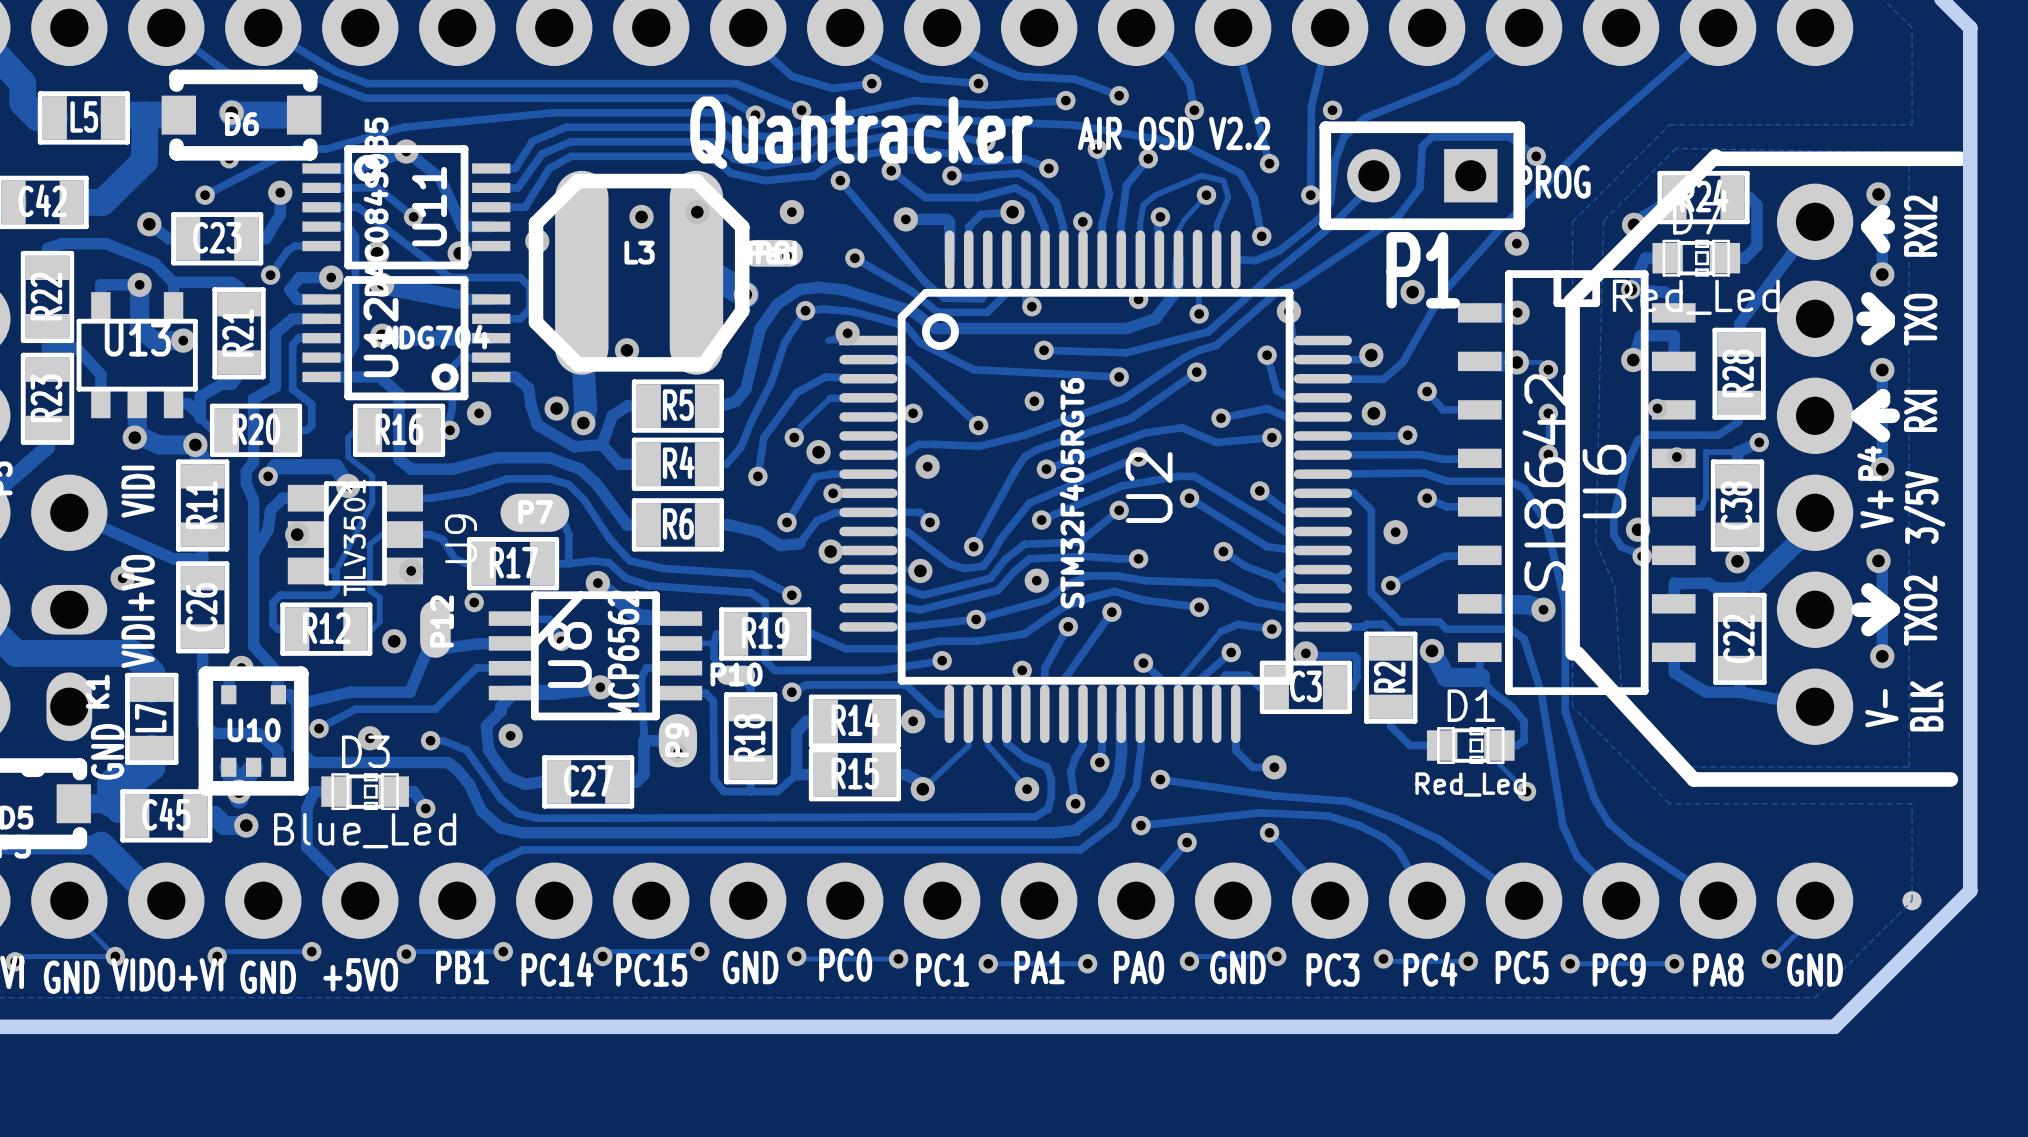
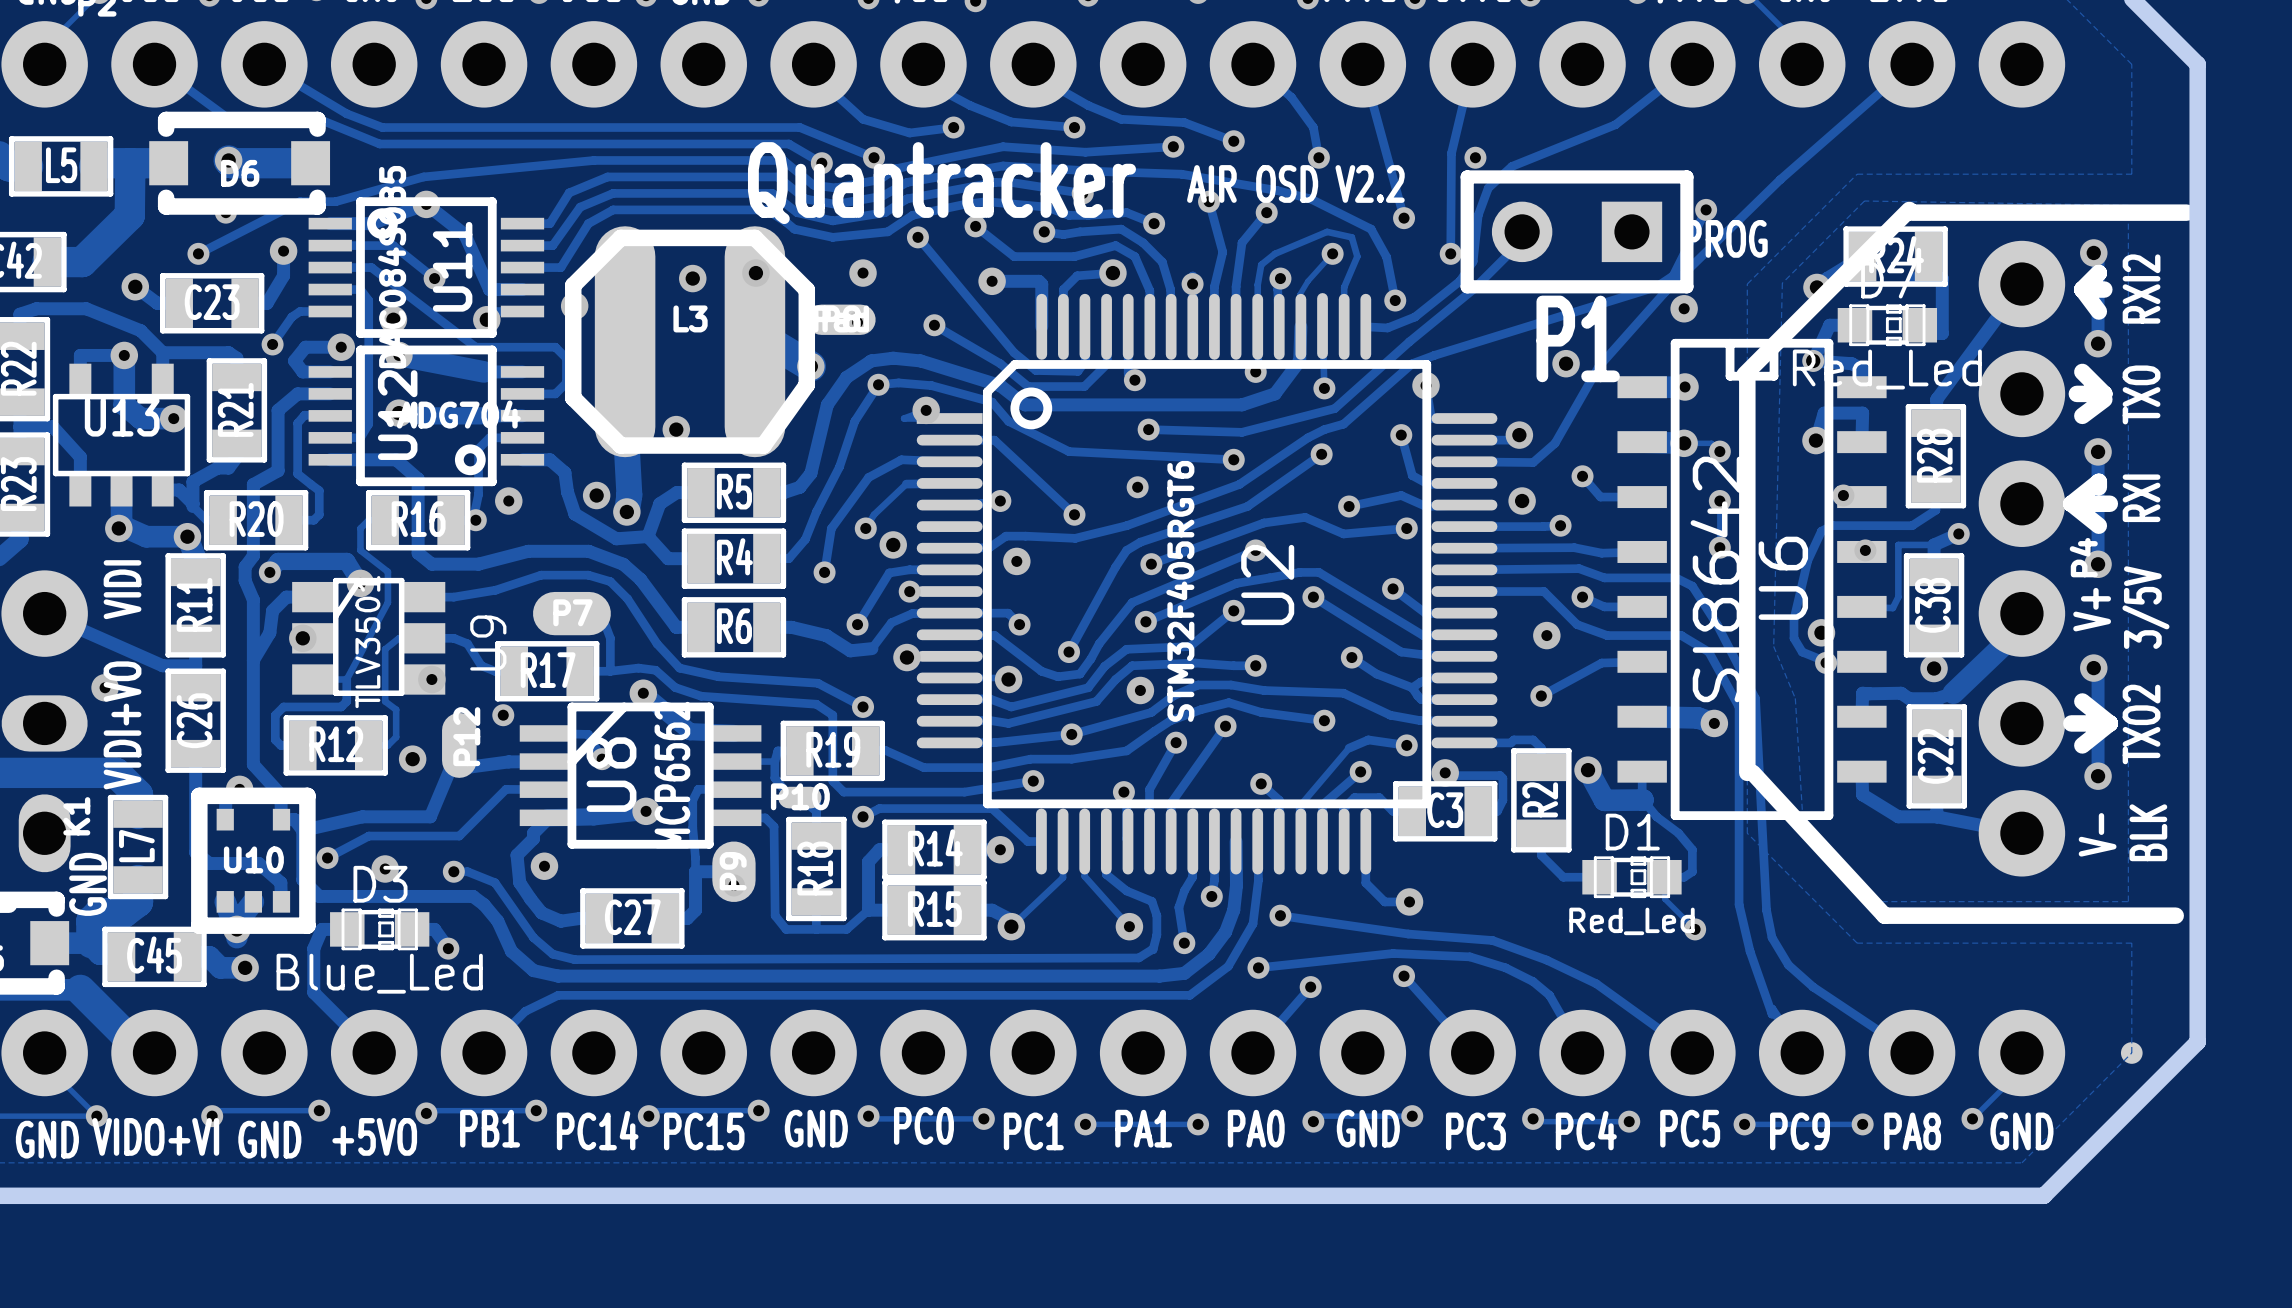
track: (1536, 156) (1509, 136) (1431, 136) (1422, 146) (1419, 187) (1398, 216) (1296, 284) -> (1706, 209) (1673, 275) (1656, 286) (1434, 355)
track: (1732, 197) (1749, 197) (1756, 204) (1756, 246) (1744, 258) (1724, 258) -> none
track: none -> (1914, 278) (1942, 278) (1942, 333) (1911, 333)
track: (1354, 493) (1371, 510) (1371, 592) (1400, 621) (1439, 621) (1446, 629) (1510, 629) (1524, 638) (1541, 692) (1562, 825) (1577, 857) (1621, 900) -> none
track: (1545, 522) (1565, 604) -> (1500, 591) (1543, 591) (1577, 624) (1607, 635) (1681, 635) (1708, 652) (1739, 706) (1739, 717)
track: none -> (1717, 624) (1755, 698) (1766, 910) (1772, 937)
track: (1565, 711) (1594, 798) -> (1739, 838) (1739, 904) (1750, 951) (1772, 1014) (1772, 1009) (1802, 1052)

